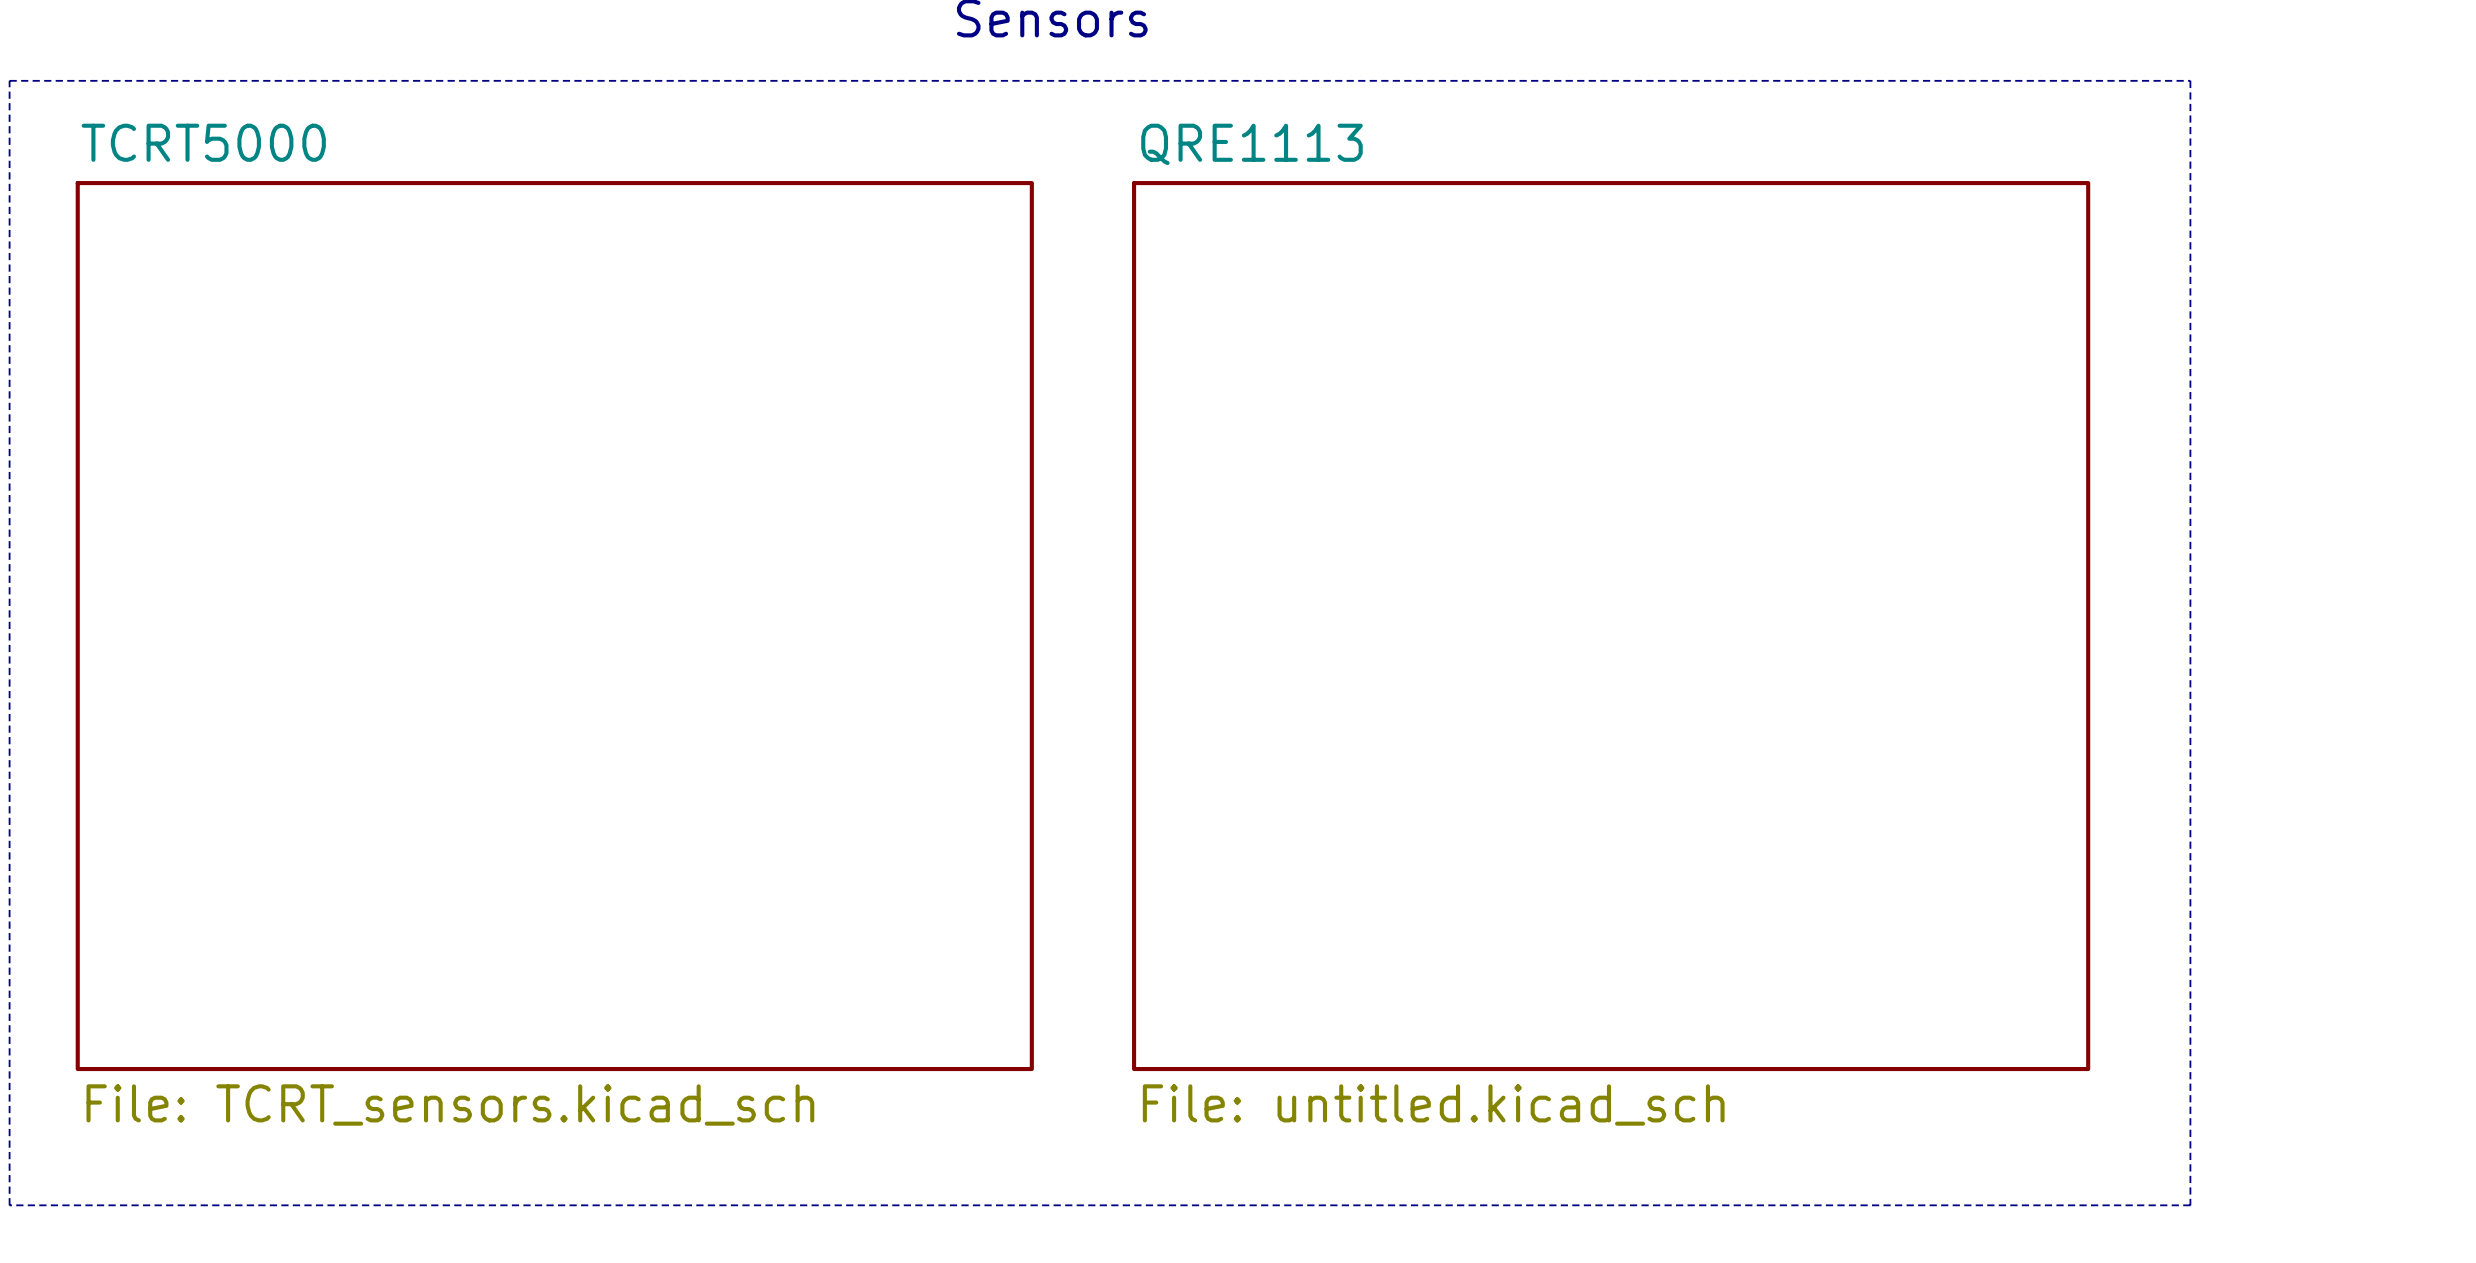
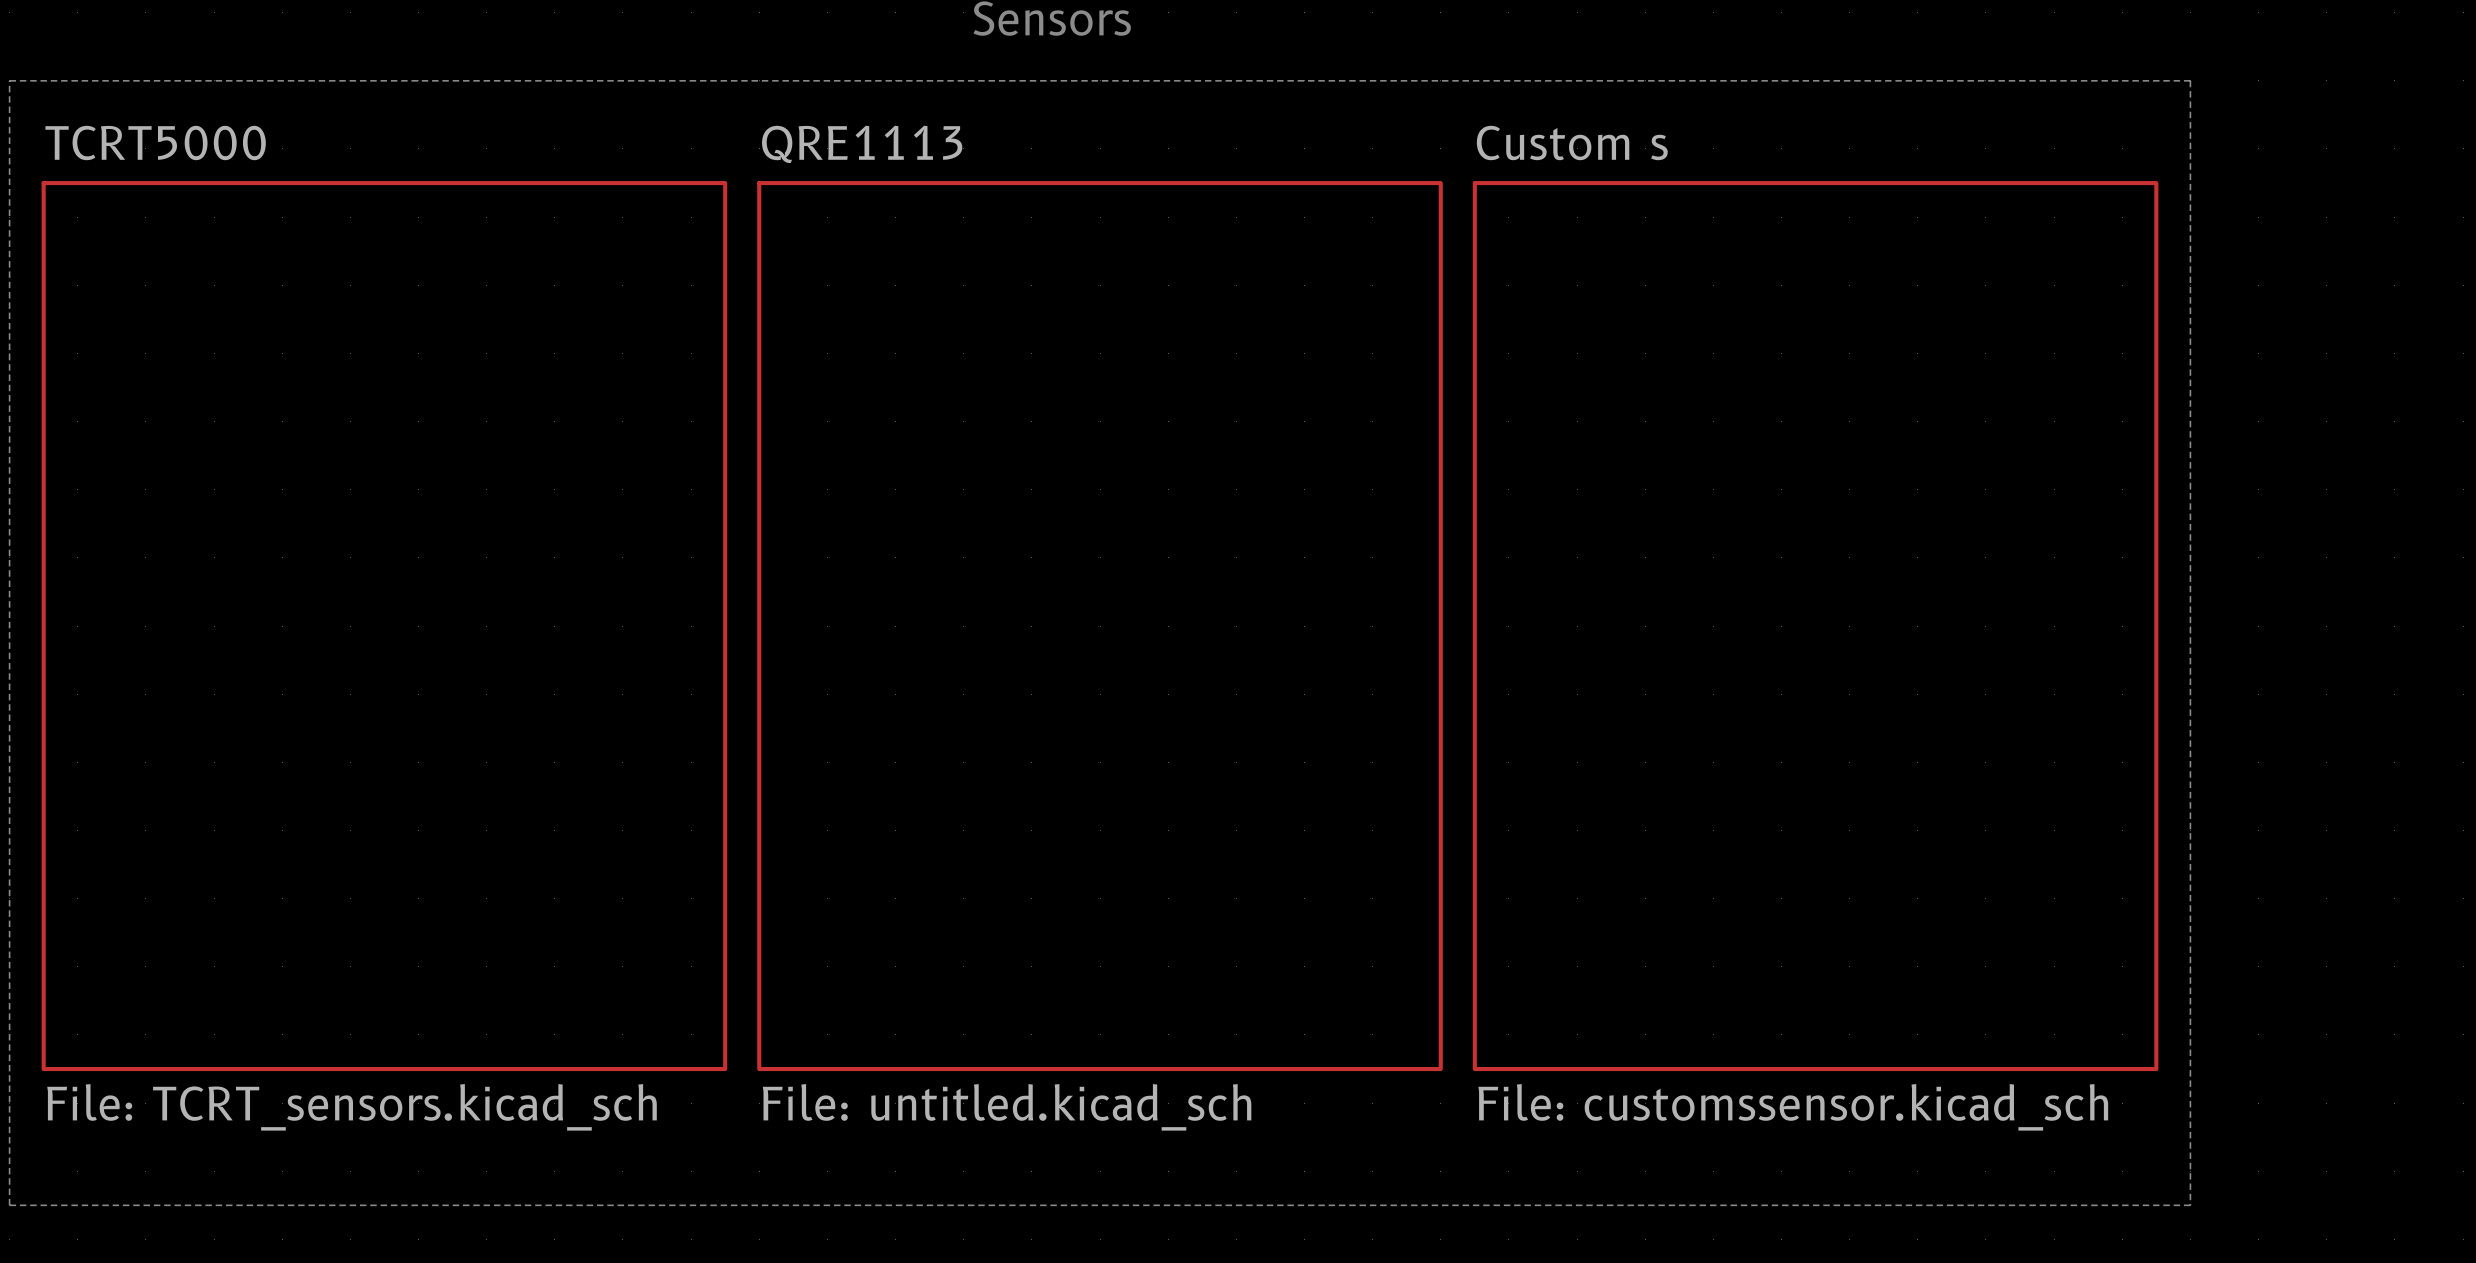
sheet TCRT5000 name position: TCRT5000 (203, 142) -> TCRT5000 (155, 142)
sheet QRE1113 name position: QRE1113 (1251, 144) -> QRE1113 (862, 144)
sheet TCRT5000 shape: [75, 181, 1034, 1072] -> [41, 181, 728, 1072]
sheet QRE1113 shape: [1132, 181, 2091, 1072] -> [757, 181, 1443, 1072]
sheet Custom s: none -> File: customssensor.kicad_sch (1815, 626)
sheet TCRT5000 value position: File: TCRT_sensors.kicad_sch (450, 1104) -> File: TCRT_sensors.kicad_sch (352, 1107)
sheet QRE1113 value position: File: untitled.kicad_sch (1433, 1104) -> File: untitled.kicad_sch (1007, 1107)

